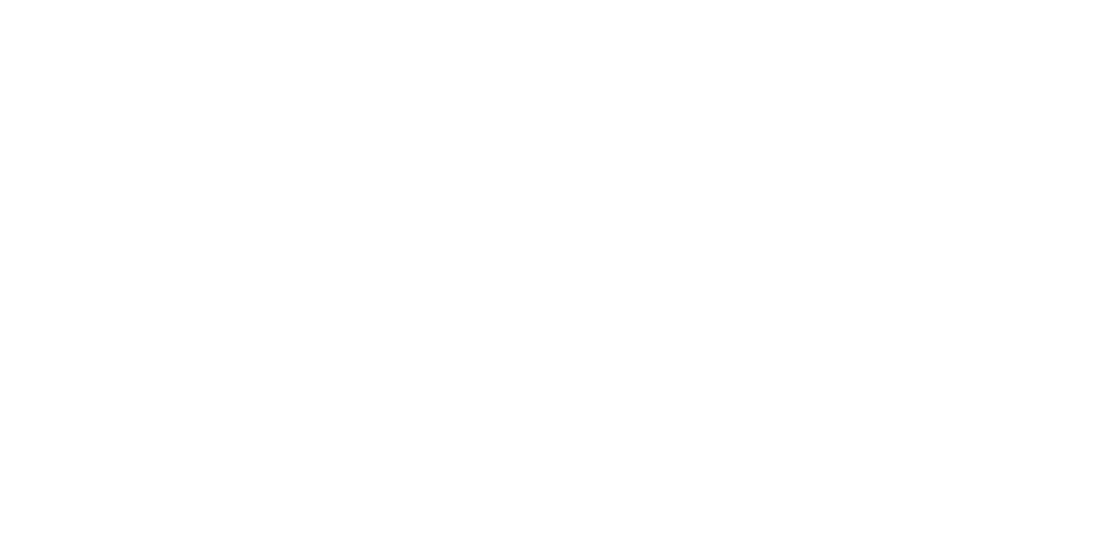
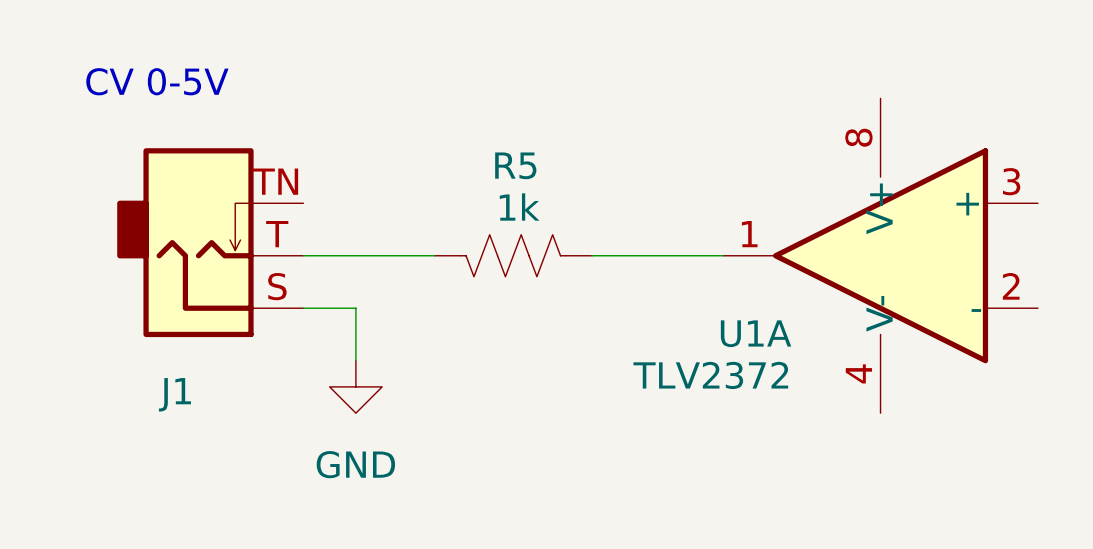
text: none -> CV 0-5V (157, 81)
J1: none -> (210, 242)
wire: none -> (303, 255) (434, 255)
R5: none -> 1k (513, 255)
wire: none -> (591, 255) (723, 255)
part: none -> (880, 255)
U1A: none -> TLV2372 (880, 255)
wire: none -> (303, 308) (355, 308) (355, 360)
power symbol: none -> GND (355, 386)

